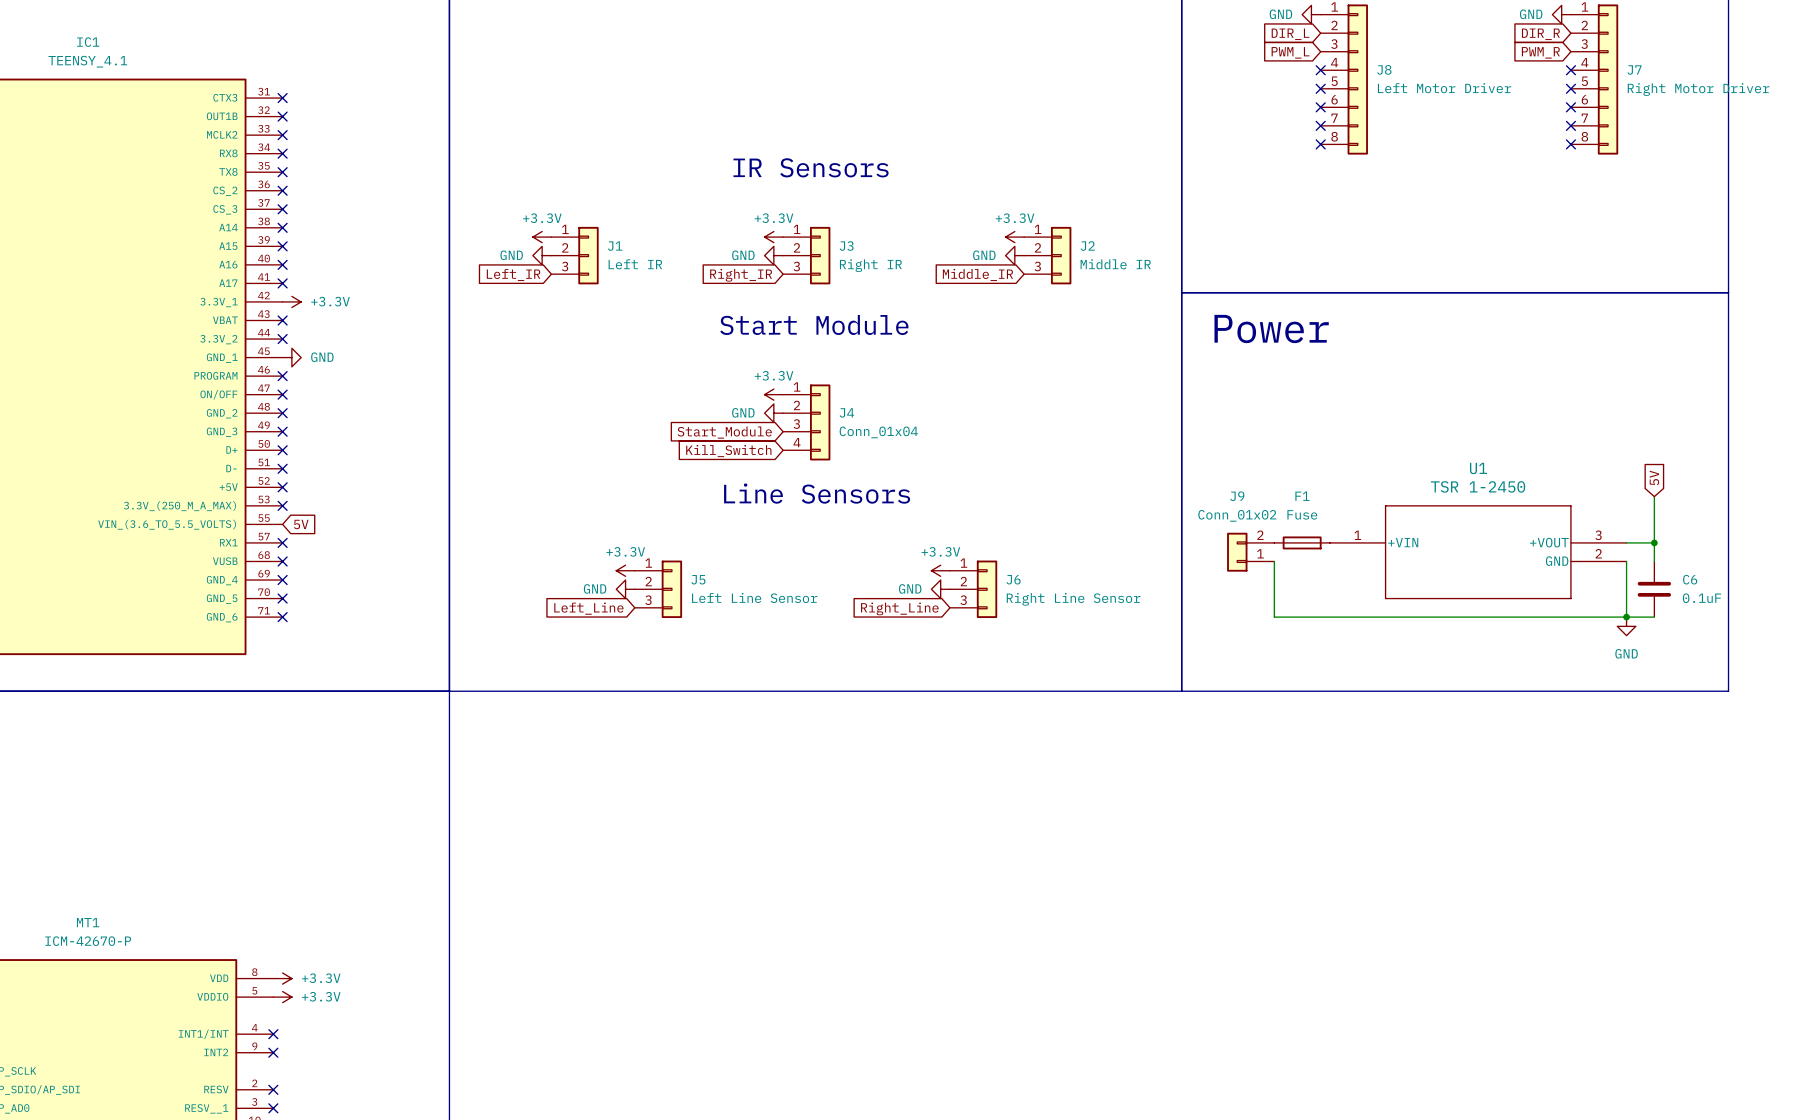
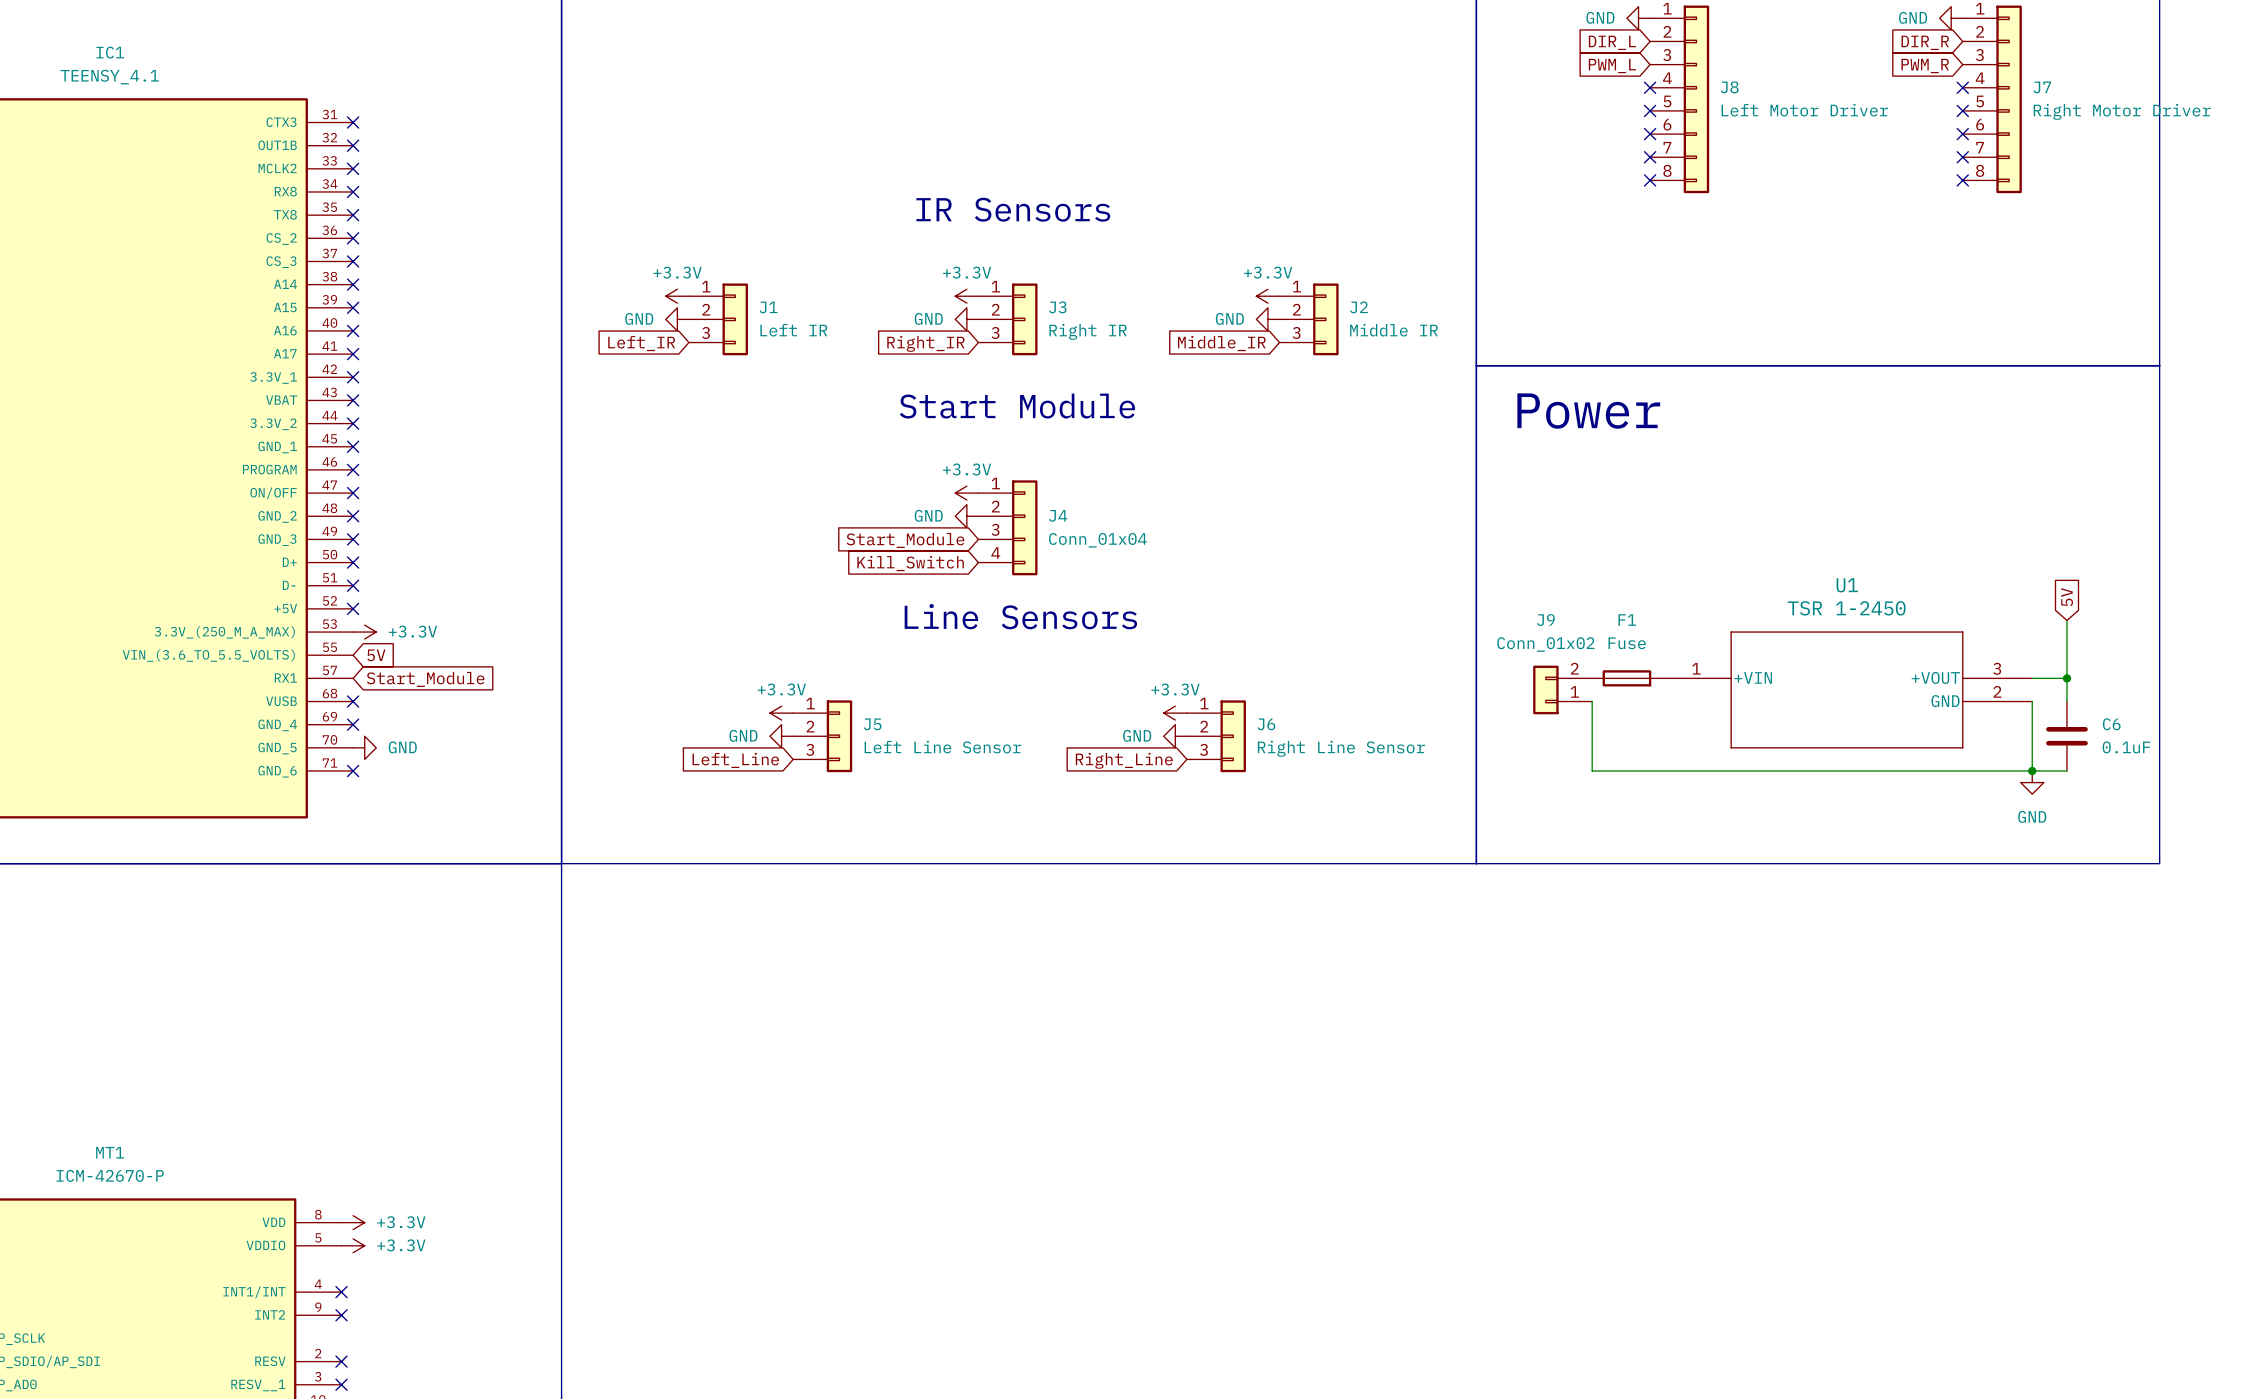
no-connect mark: none -> (353, 377)
power symbol: +3.3V (291, 301) -> none
no-connect mark: none -> (353, 446)
power symbol: GND (291, 357) -> none
no-connect mark: (282, 505) -> none
power symbol: none -> +3.3V (364, 632)
no-connect mark: (282, 542) -> none
global label: none -> Start_Module (425, 679)
no-connect mark: (282, 598) -> none
power symbol: none -> GND (364, 747)

